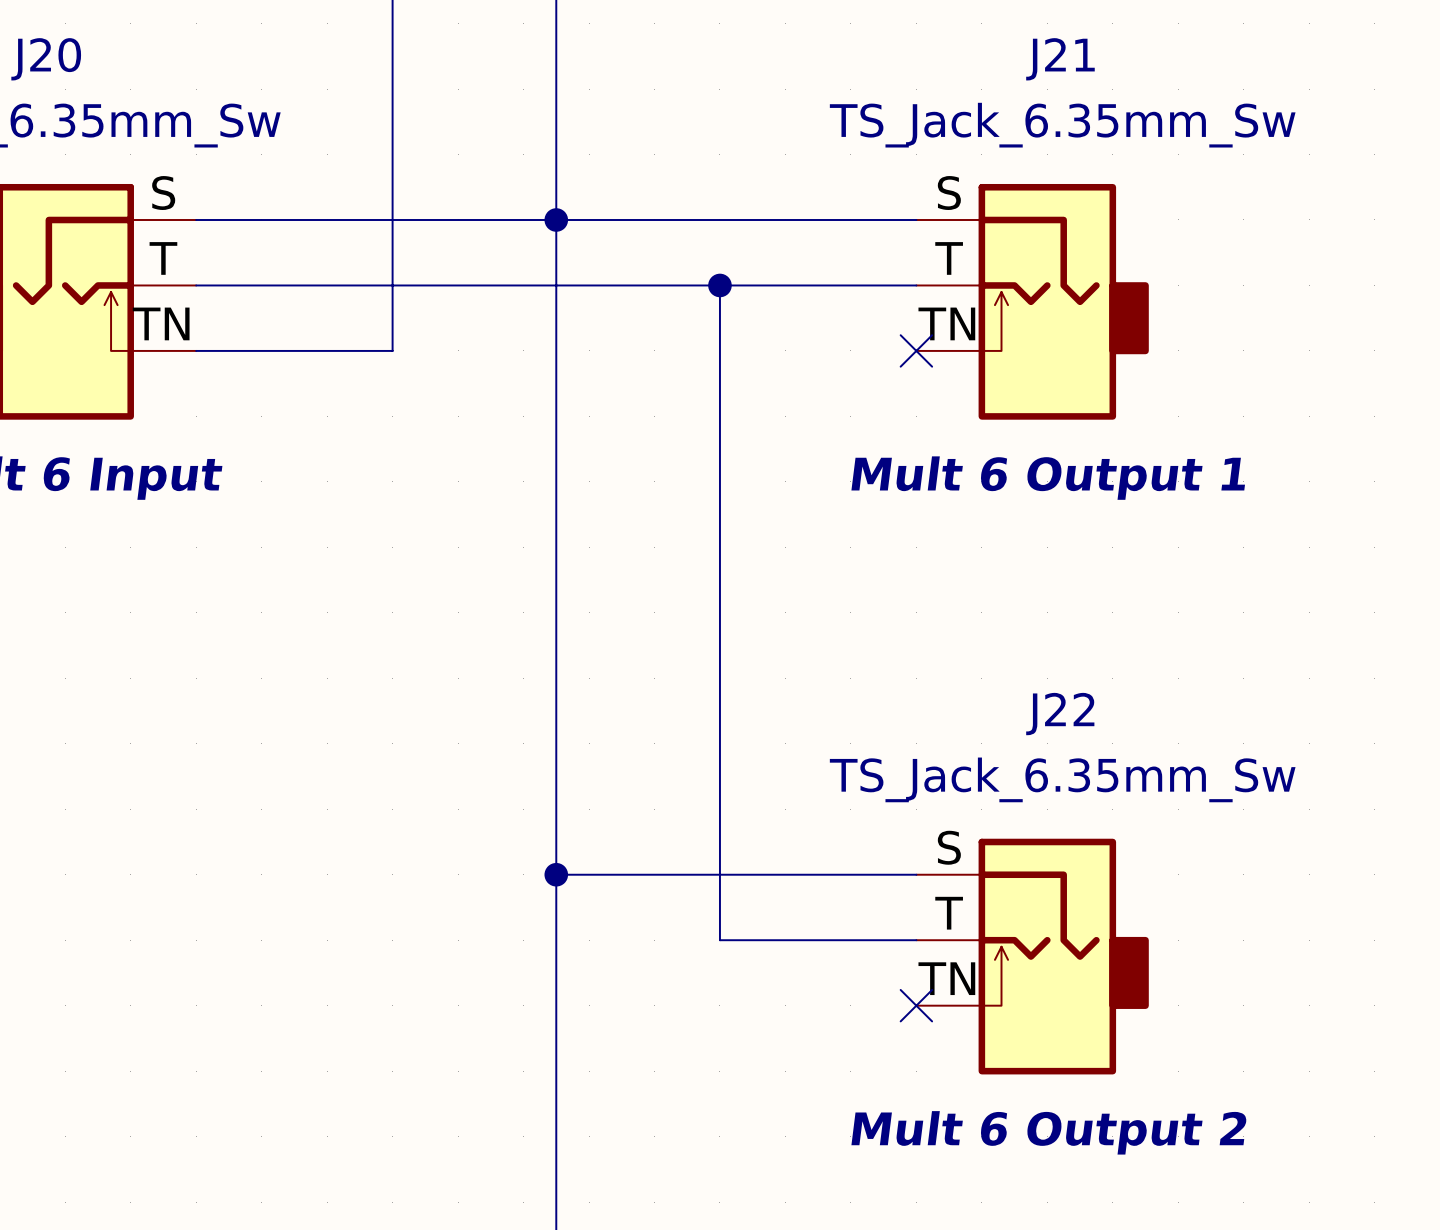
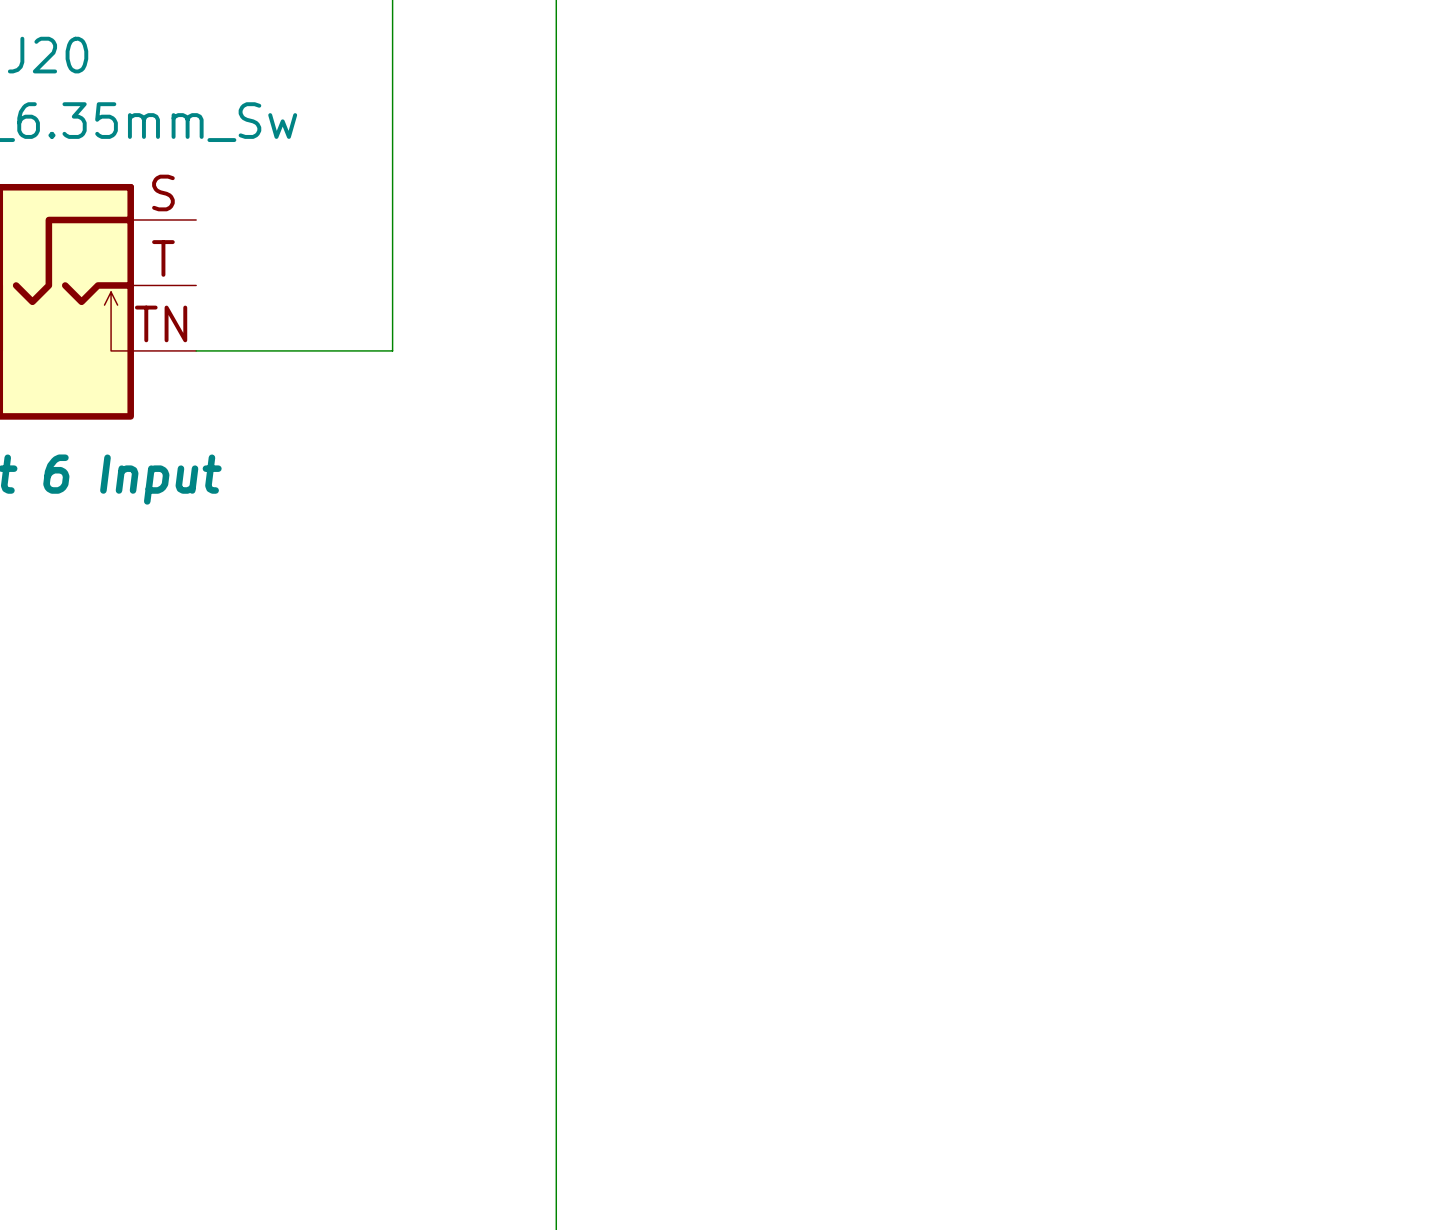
wire: (196, 219) (916, 219) -> none
junction: (556, 219) -> none
wire: (196, 285) (916, 285) -> none
wire: (719, 285) (719, 940) (916, 940) -> none
junction: (719, 285) -> none
J21: TS_Jack_6.35mm_Sw (1032, 301) -> none
no-connect mark: (916, 350) -> none
wire: (556, 874) (916, 874) -> none
junction: (556, 874) -> none
J22: TS_Jack_6.35mm_Sw (1032, 956) -> none
no-connect mark: (916, 1005) -> none

